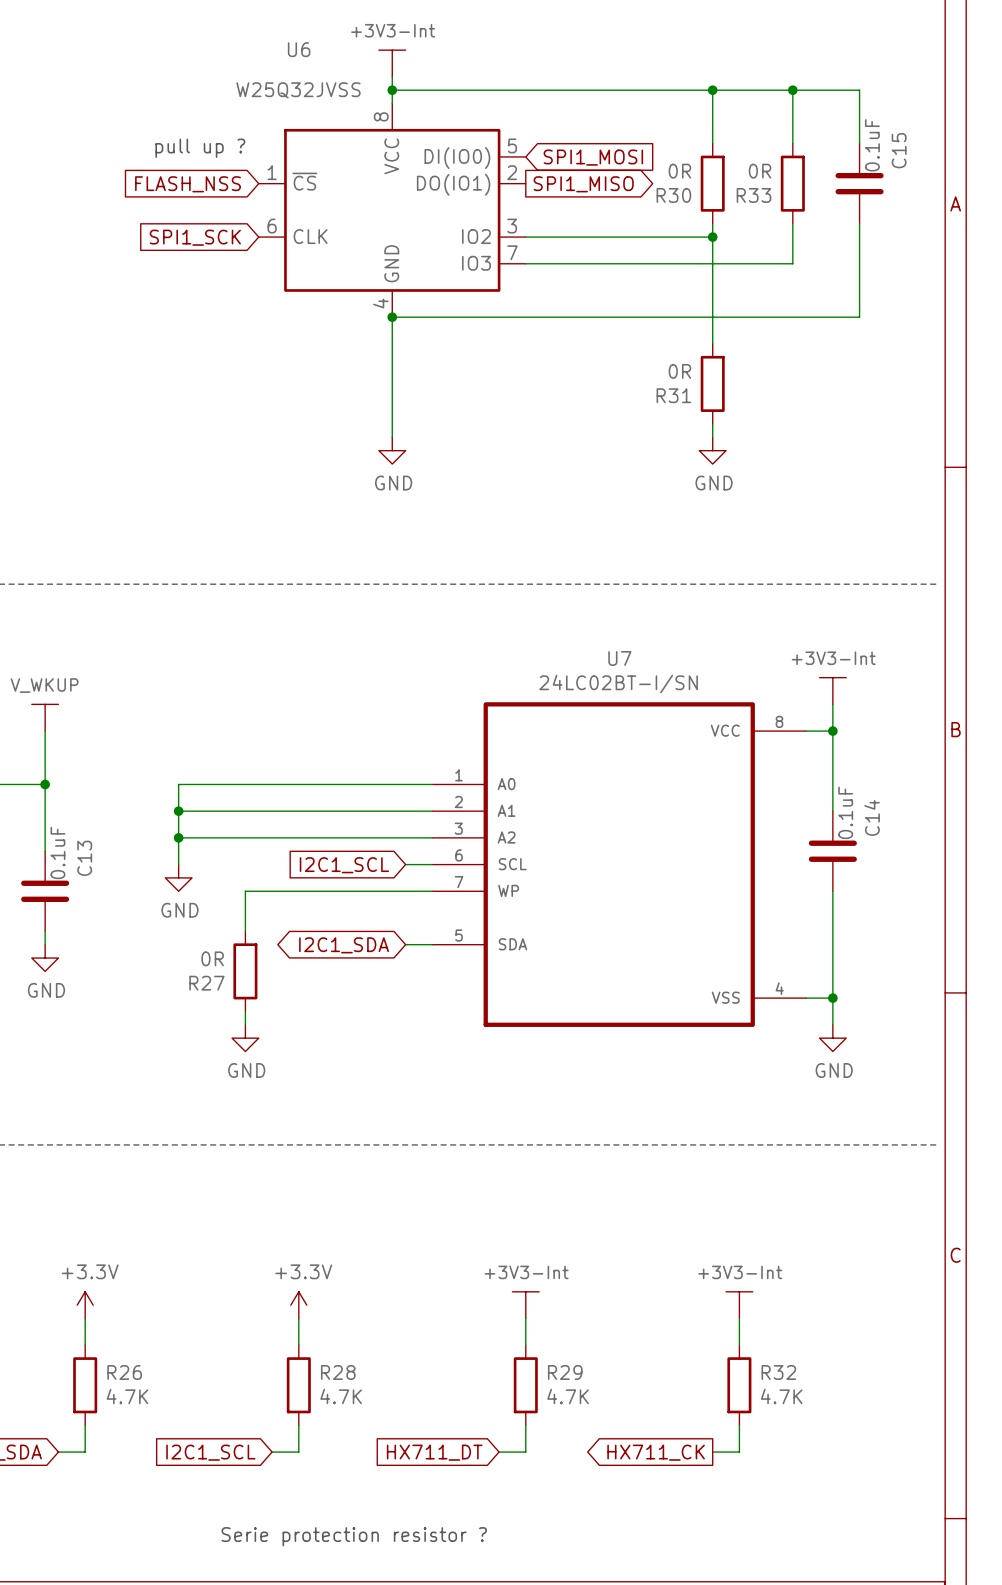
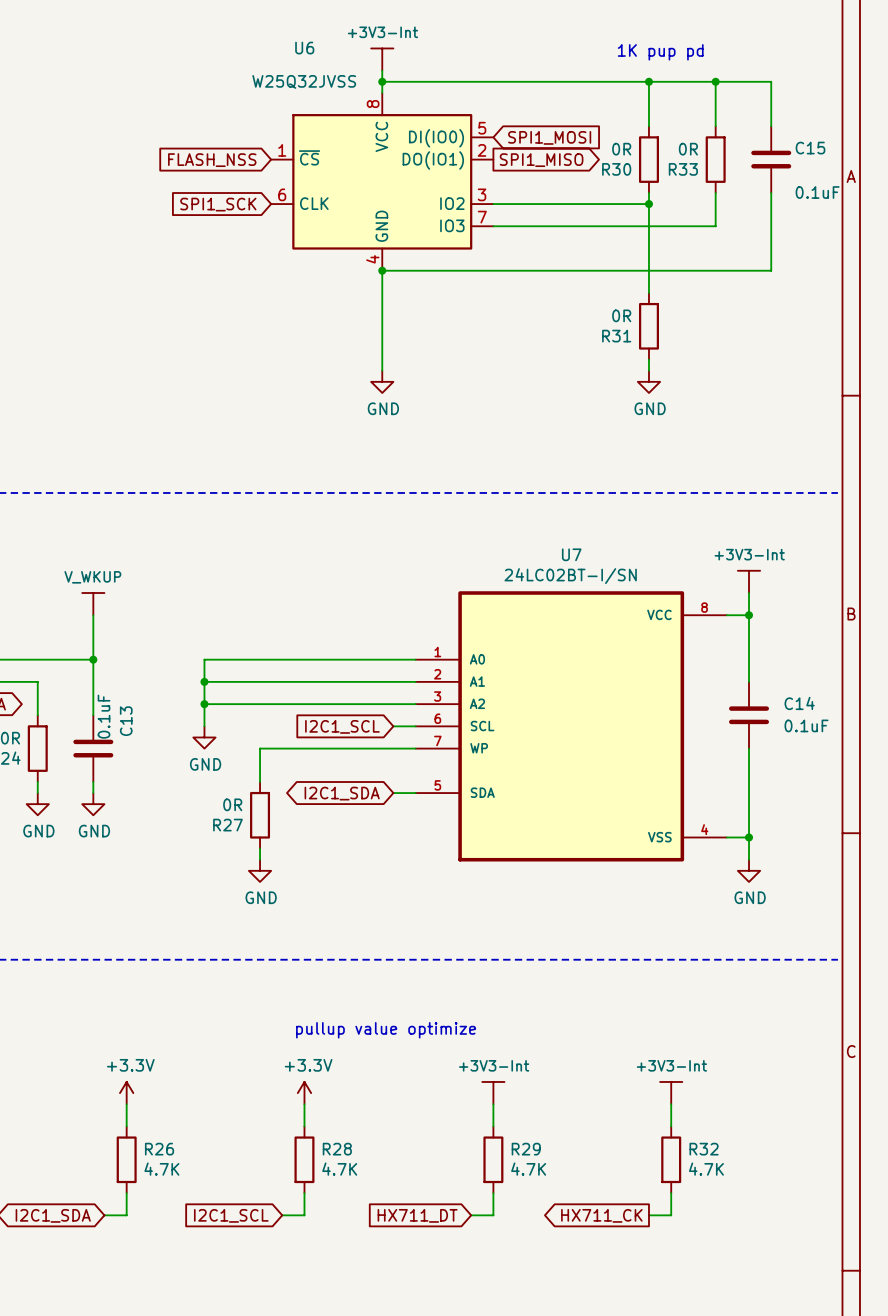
text: none -> 1K pup pd (660, 52)
C15 value rotation: 0° (872, 145) -> 90° clockwise (817, 192)
C15 value position: 0.1uF (872, 145) -> 0.1uF (817, 192)
text: pull up ? (200, 148) -> none
C15 name rotation: 0° (899, 150) -> 90° clockwise (810, 148)
C14 value rotation: 0° (845, 812) -> 90° clockwise (806, 725)
C14 value position: 0.1uF (845, 812) -> 0.1uF (806, 725)
C14 name rotation: 0° (872, 817) -> 90° clockwise (799, 703)
text: none -> pullup value optimize (386, 1030)
text: Serie protection resistor ? (354, 1536) -> none

